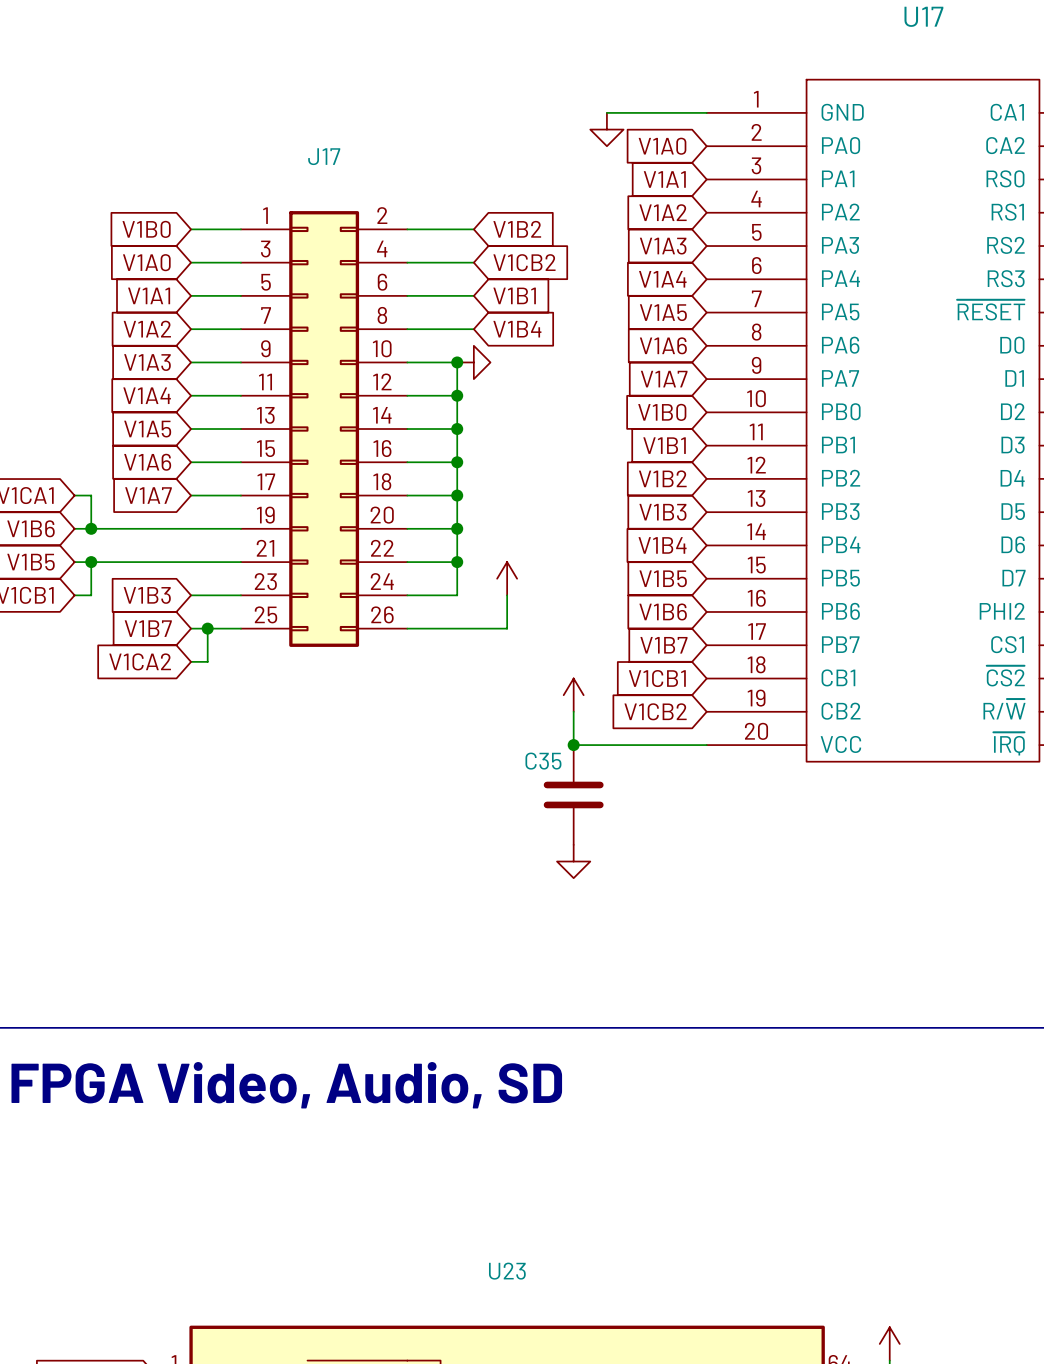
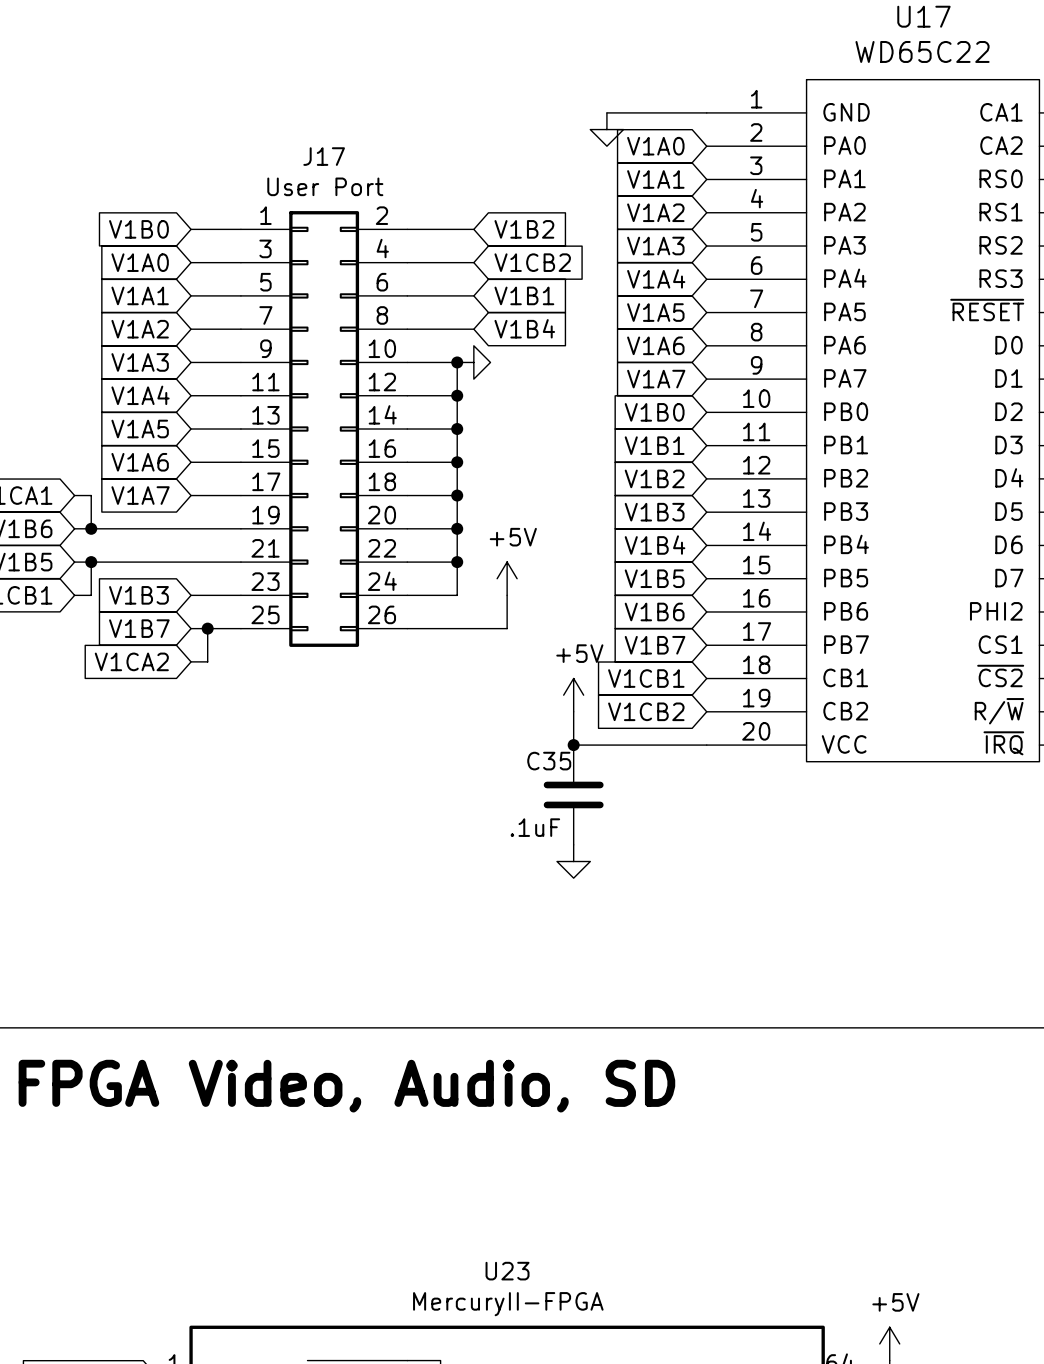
U17 value: none -> WD65C22 (922, 51)
J17 value: none -> User Port (325, 186)
power symbol text: none -> +5V (513, 537)
power symbol text: none -> +5V (579, 653)
C35 value: none -> .1uF (535, 827)
power symbol text: none -> +5V (895, 1302)
U23 value: none -> MercuryII-FPGA (508, 1304)

